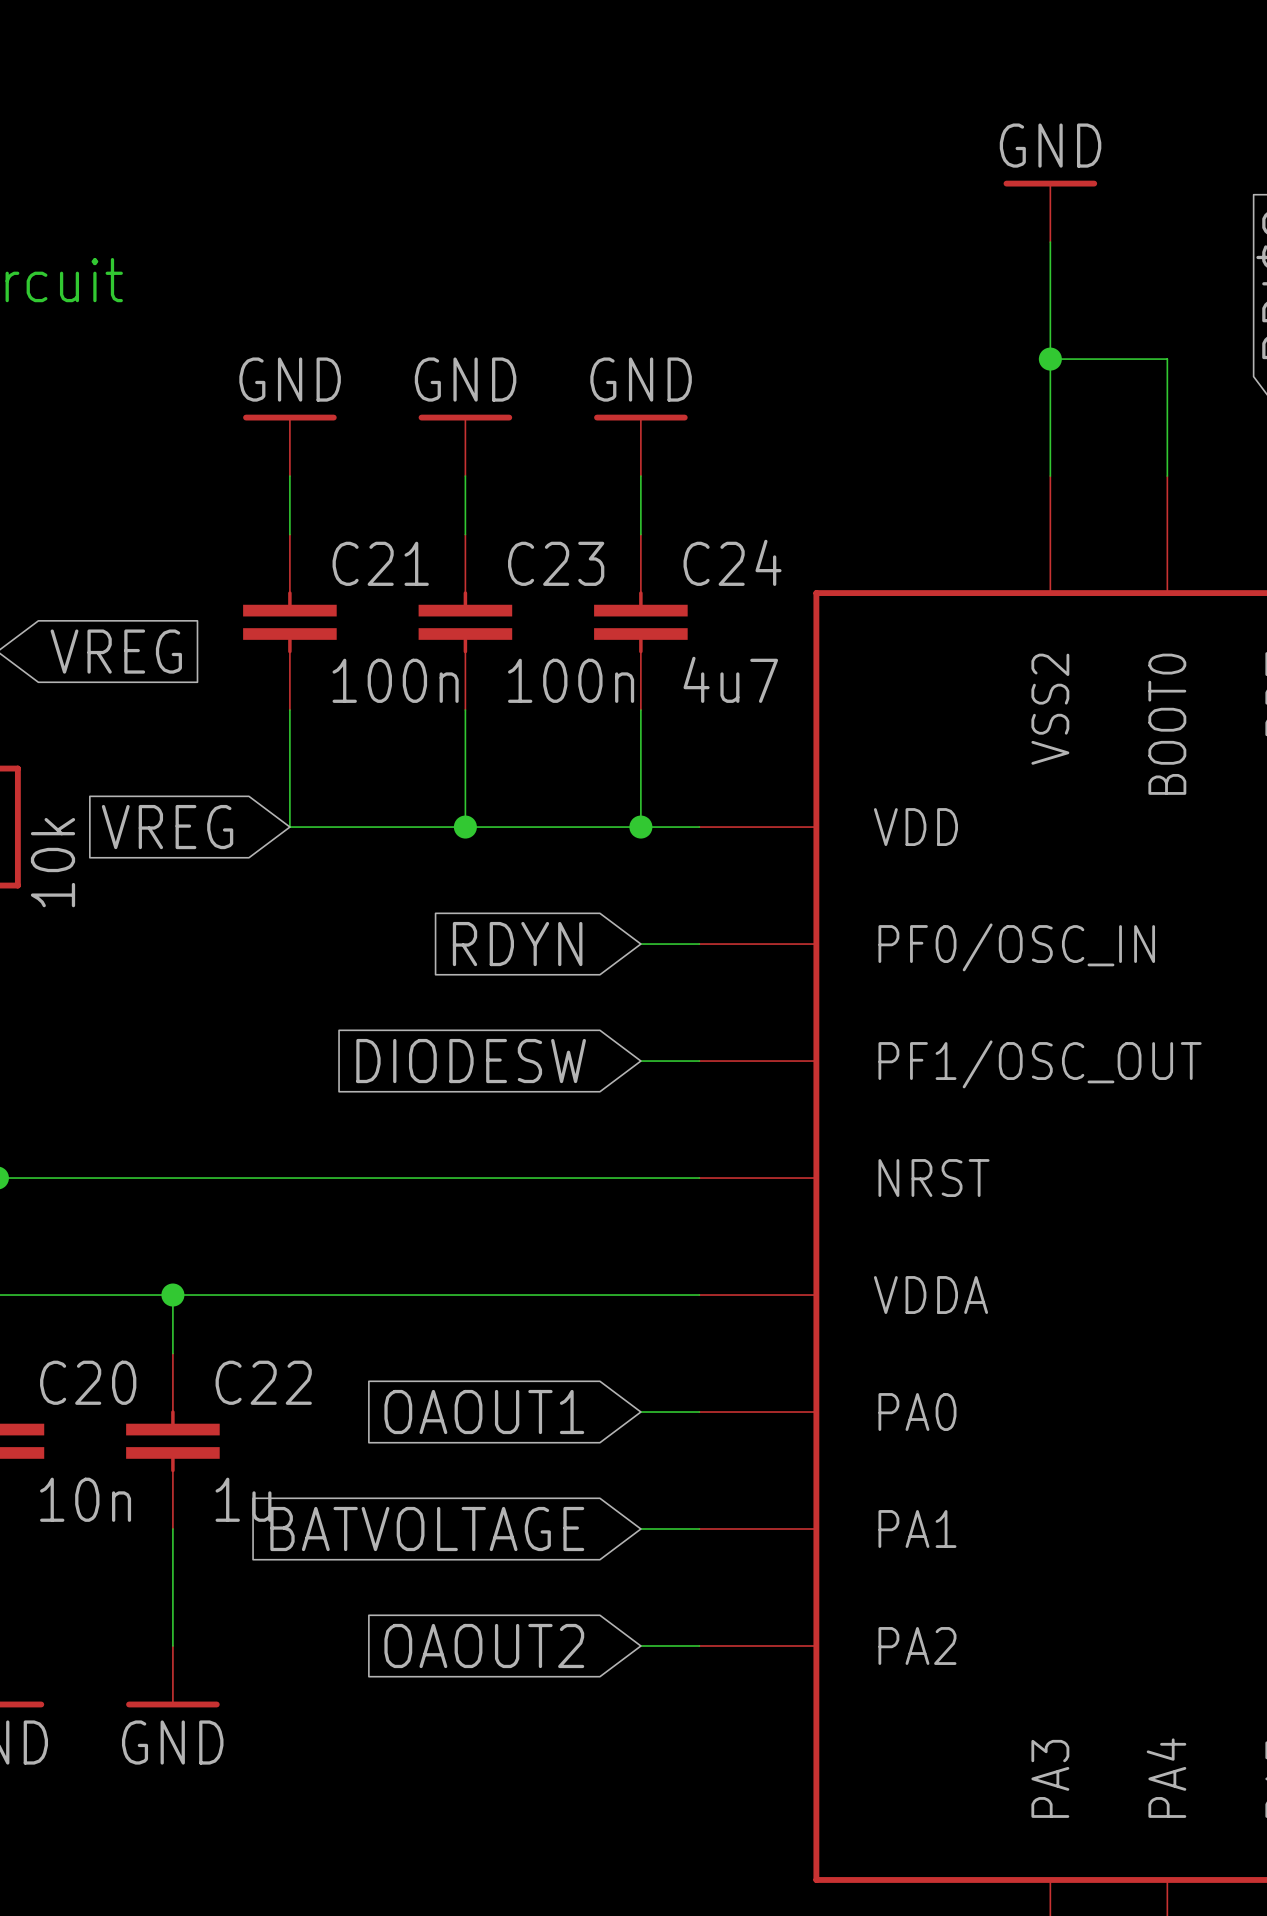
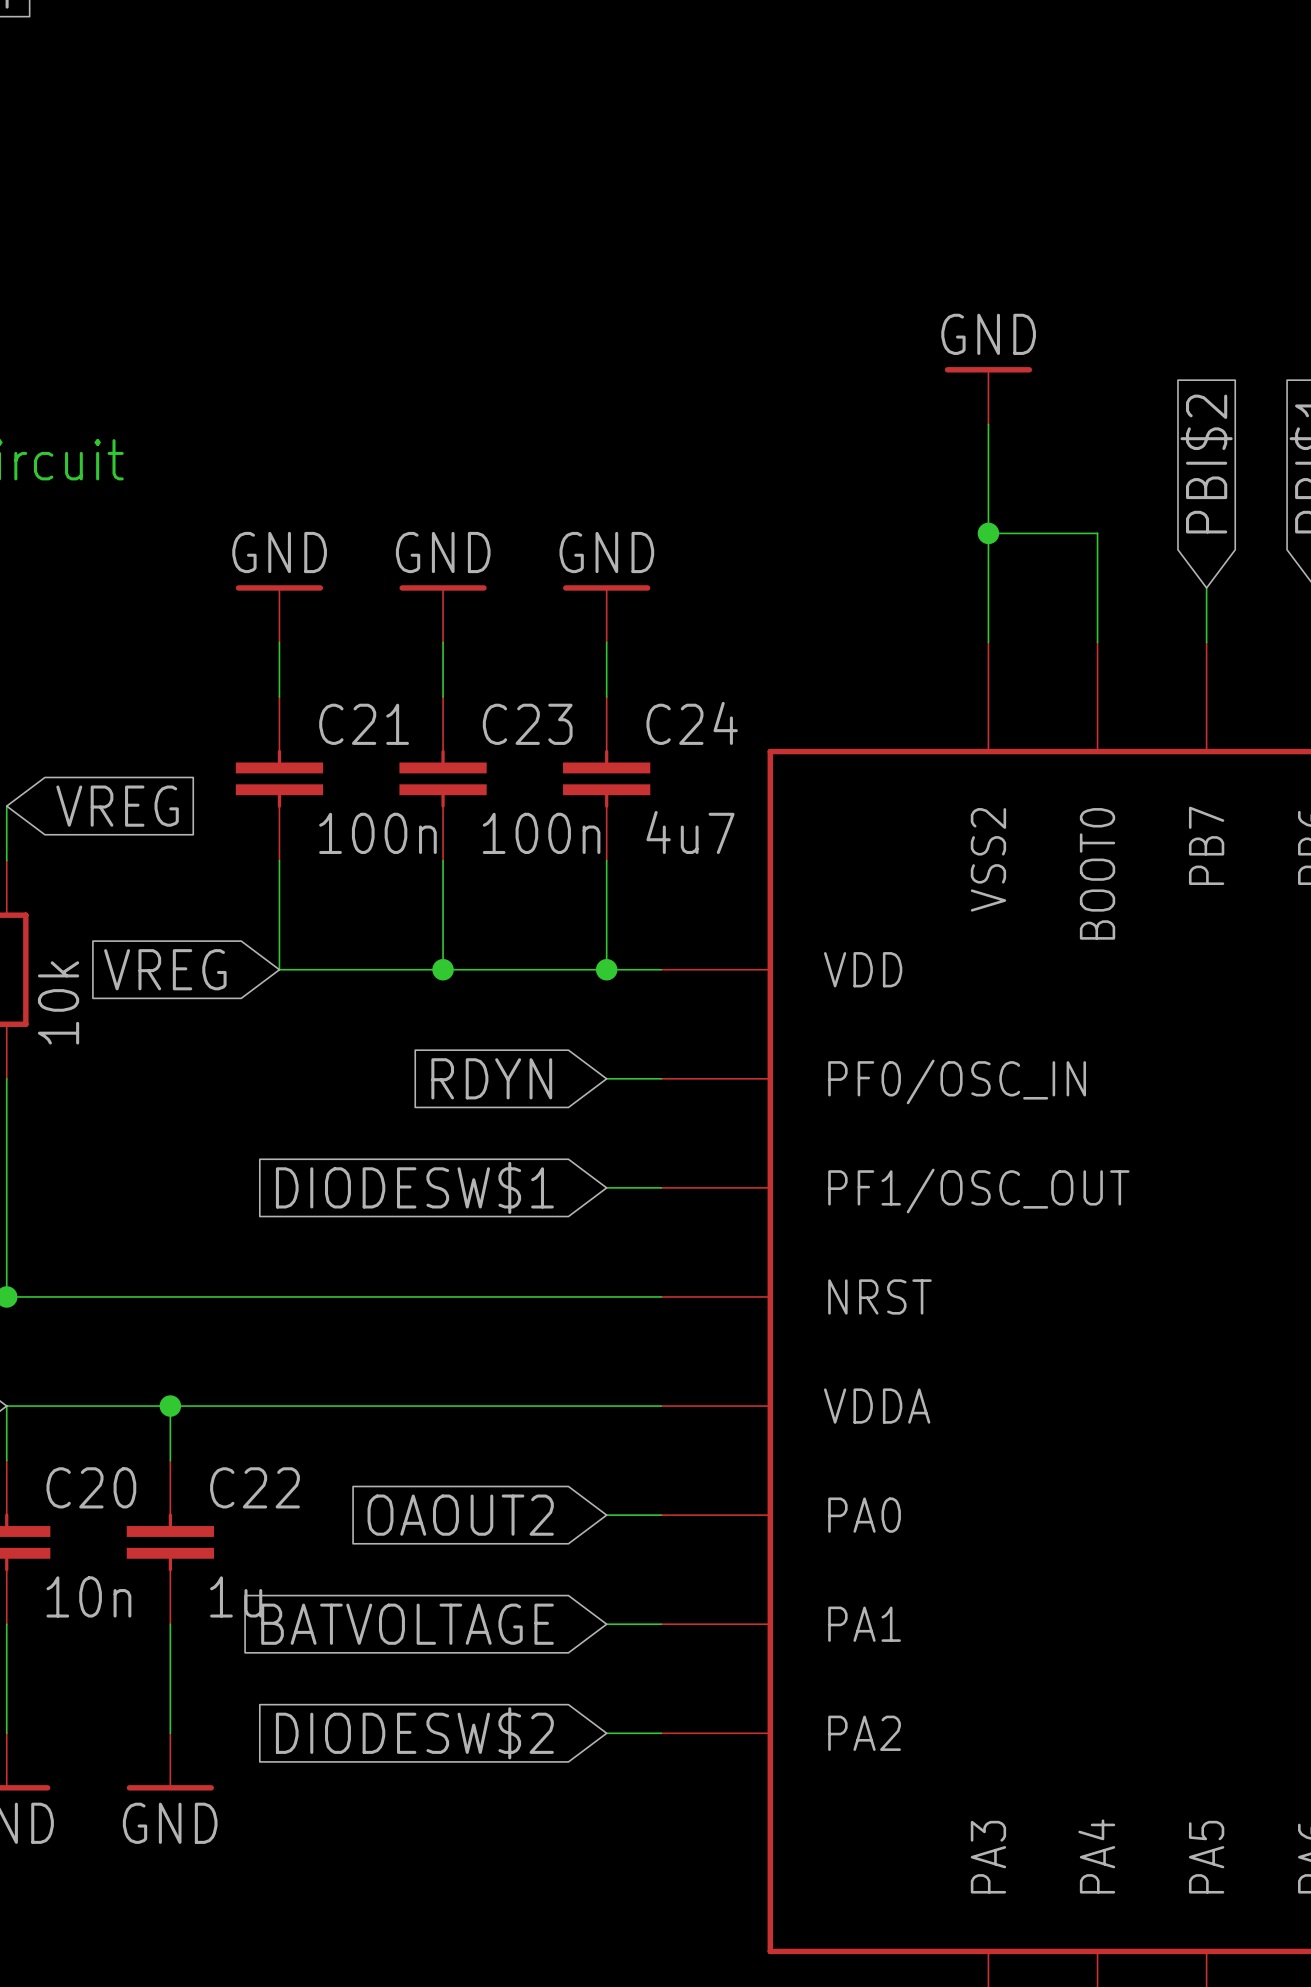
global label: DIODESW (471, 1061) -> DIODESW$1 (414, 1187)
global label: OAOUT1 (484, 1412) -> OAOUT2 (460, 1515)
global label: OAOUT2 (484, 1645) -> DIODESW$2 (414, 1733)

